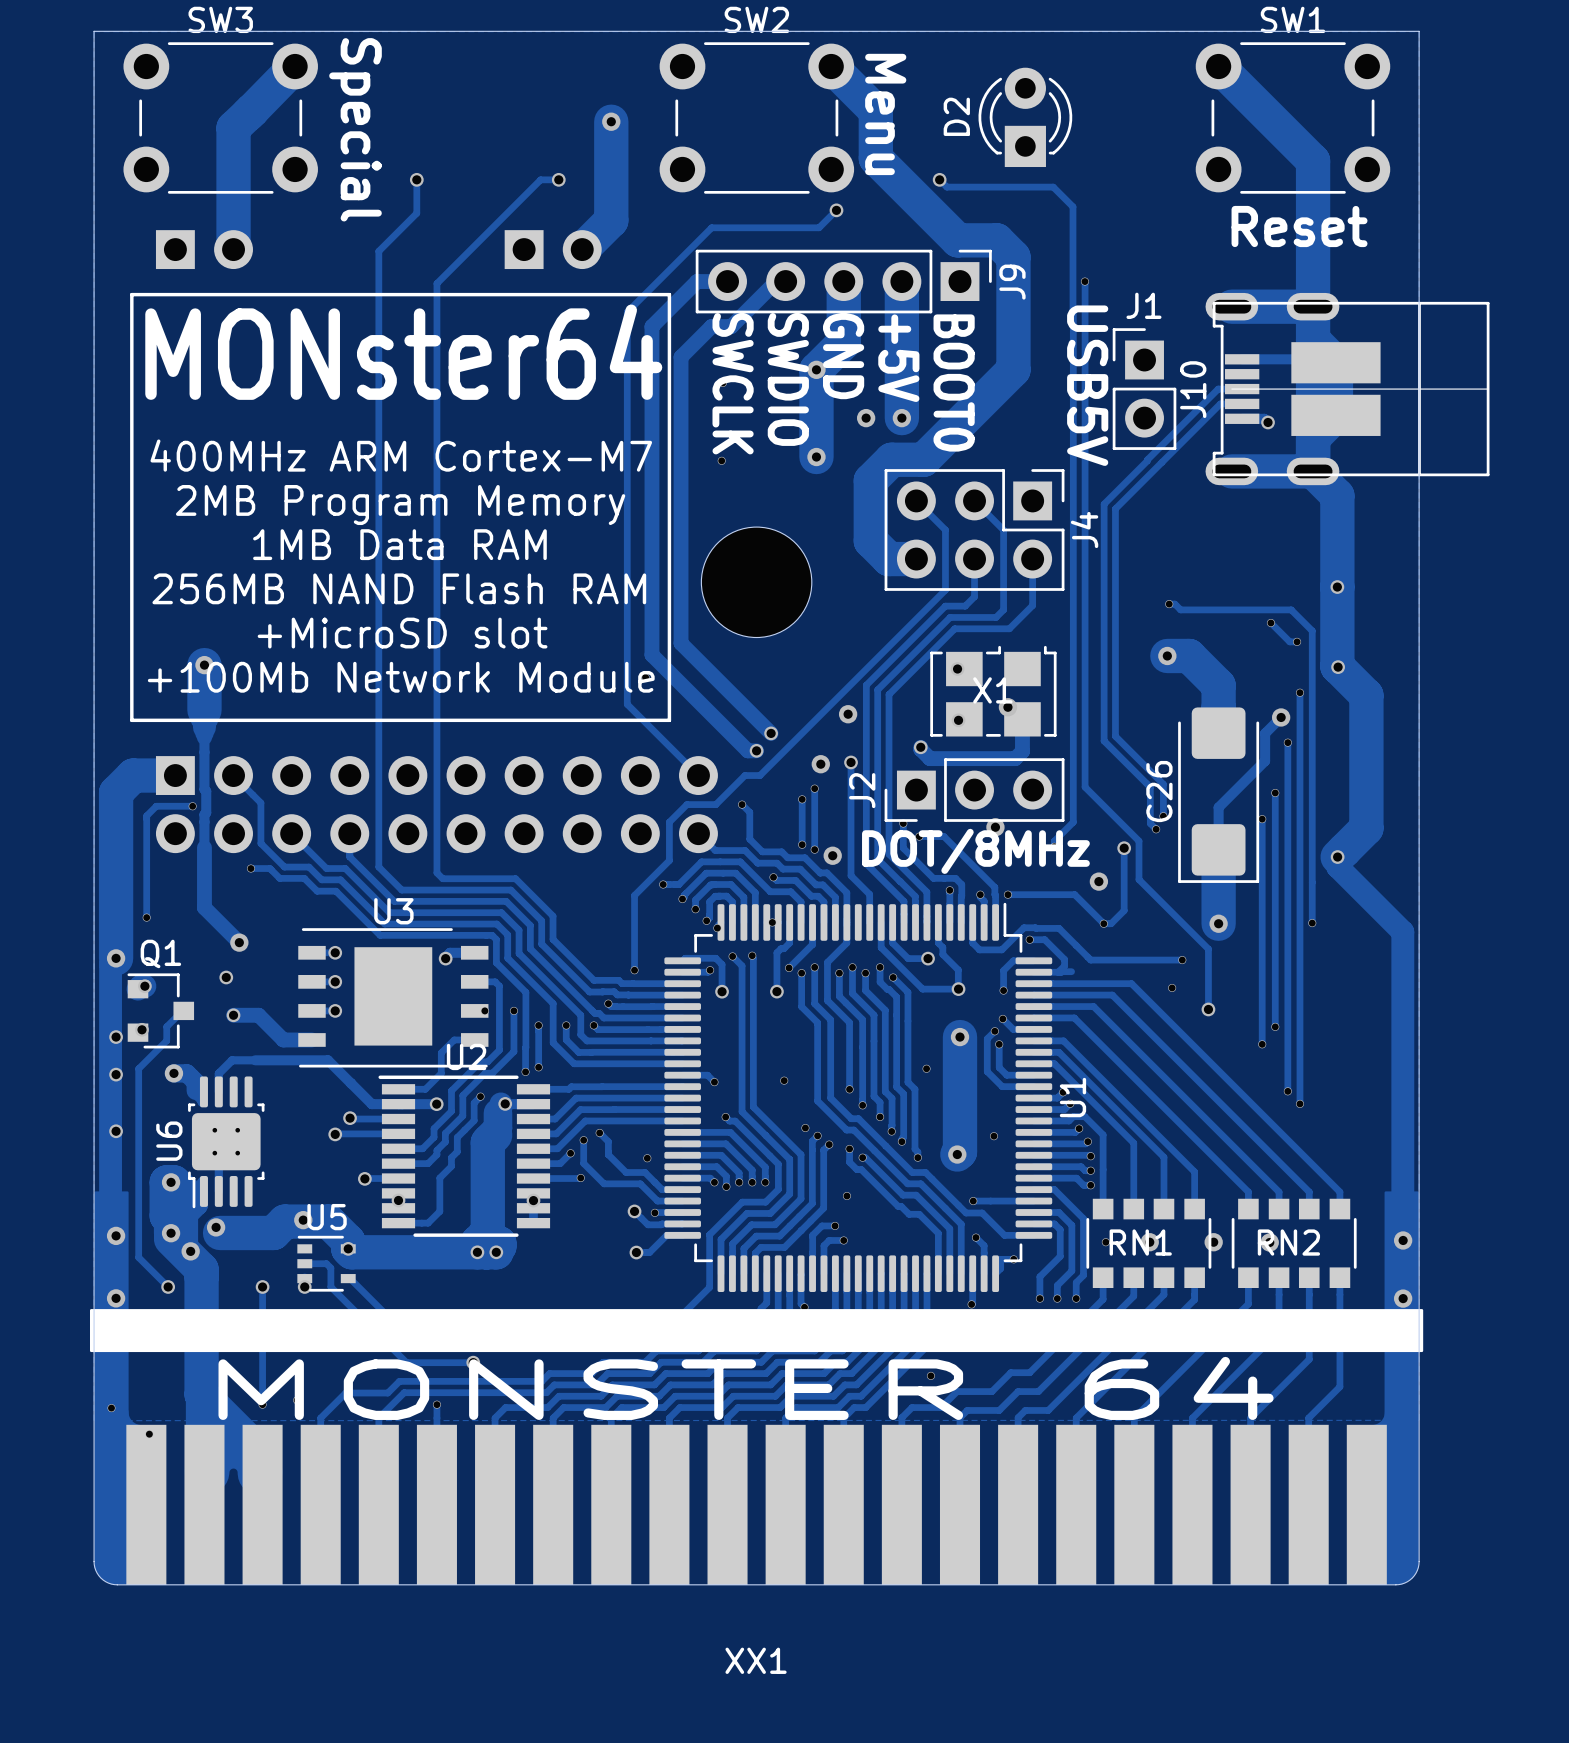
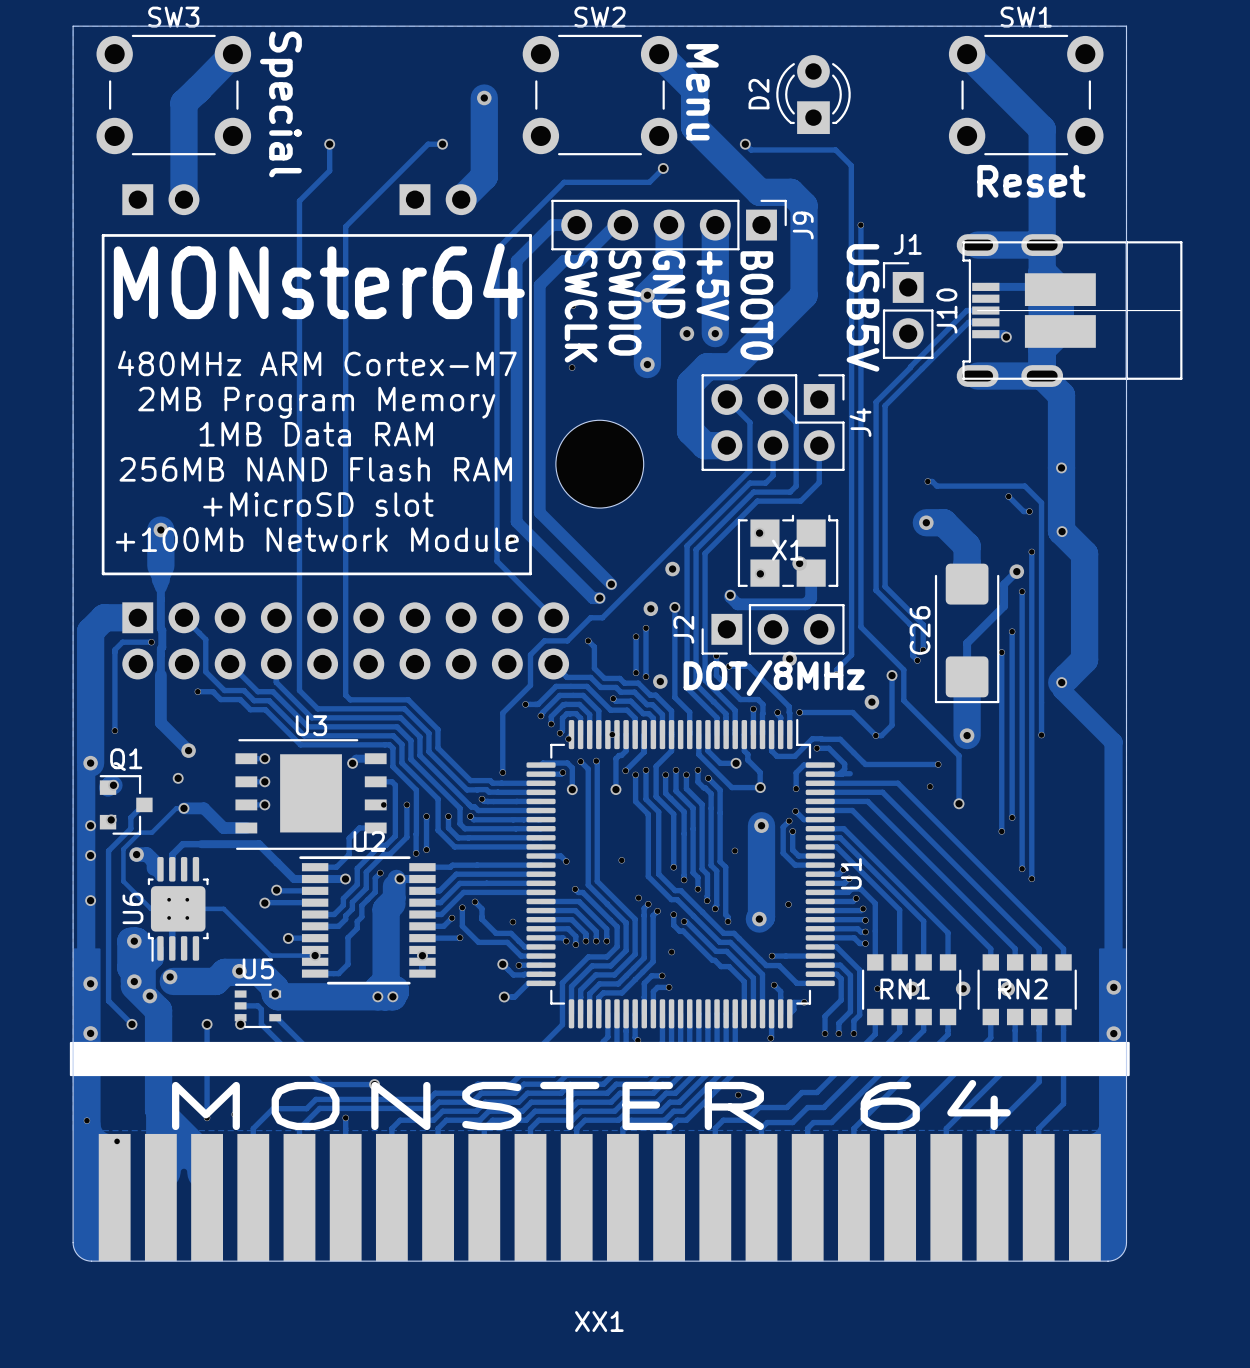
text: 400MHz ARM Cortex-M7 (401, 455) -> 480MHz ARM Cortex-M7 (317, 363)
track: none -> (183, 808) (176, 808) (152, 832) (139, 832) (123, 849) (123, 881) (150, 908) (223, 908) (270, 955) (315, 955)

